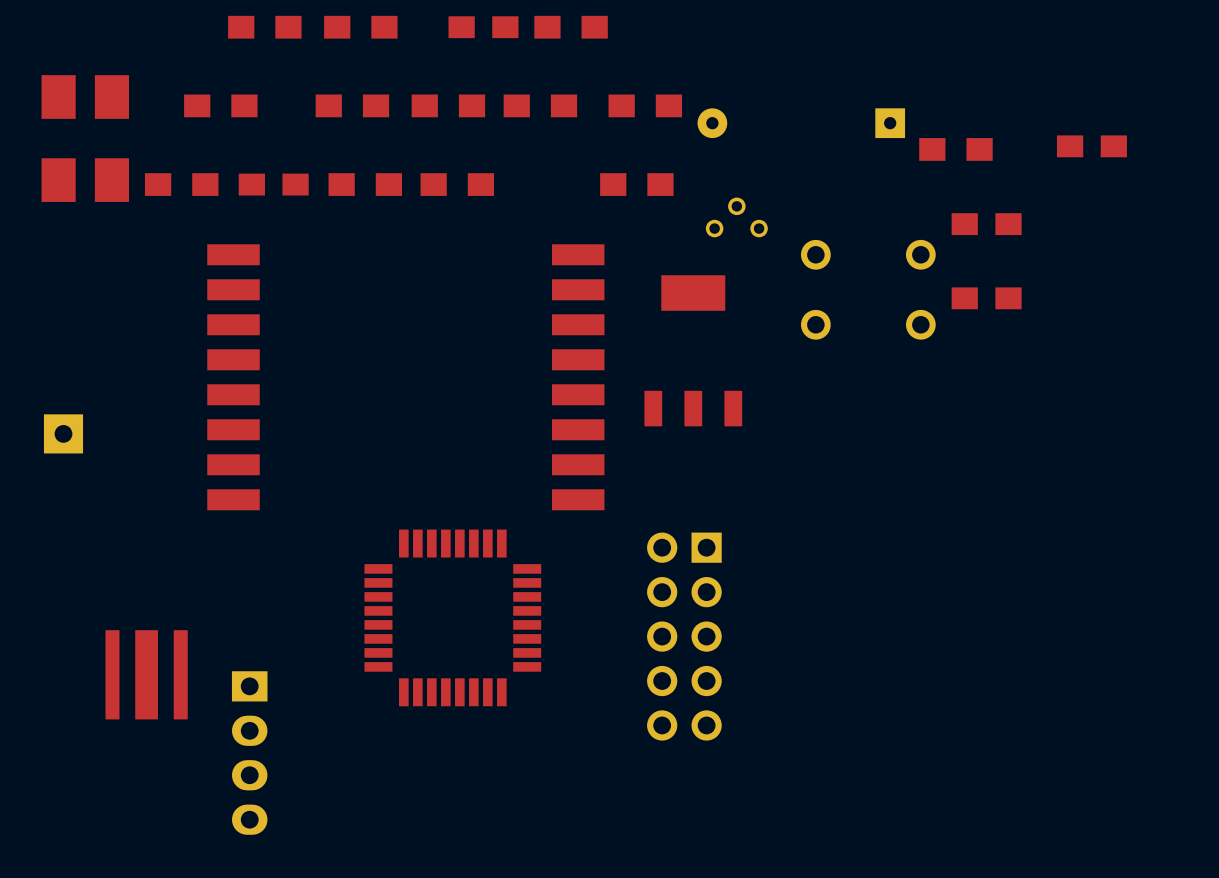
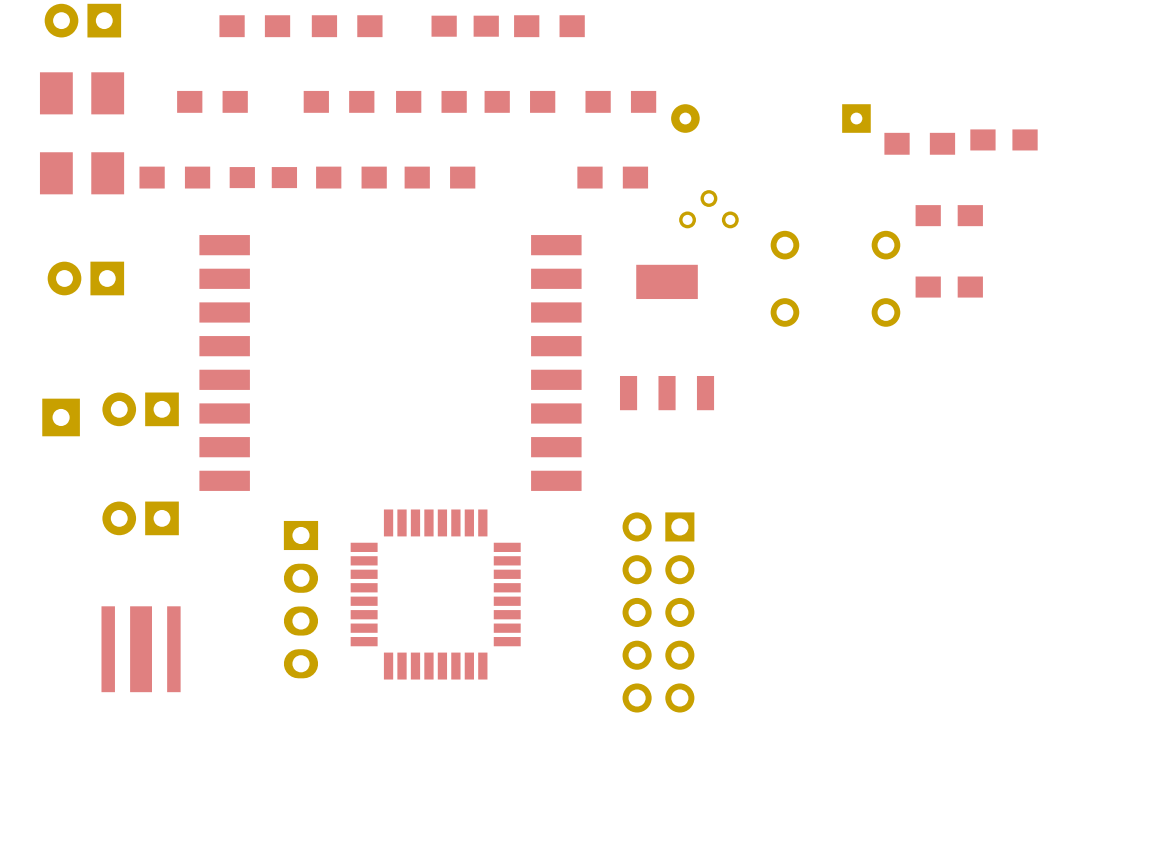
part: none -> (82, 20)
part position: (1091, 146) -> (1003, 139)
part: none -> (85, 278)
part: none -> (140, 409)
part: none -> (140, 518)
part position: (249, 753) -> (300, 599)

